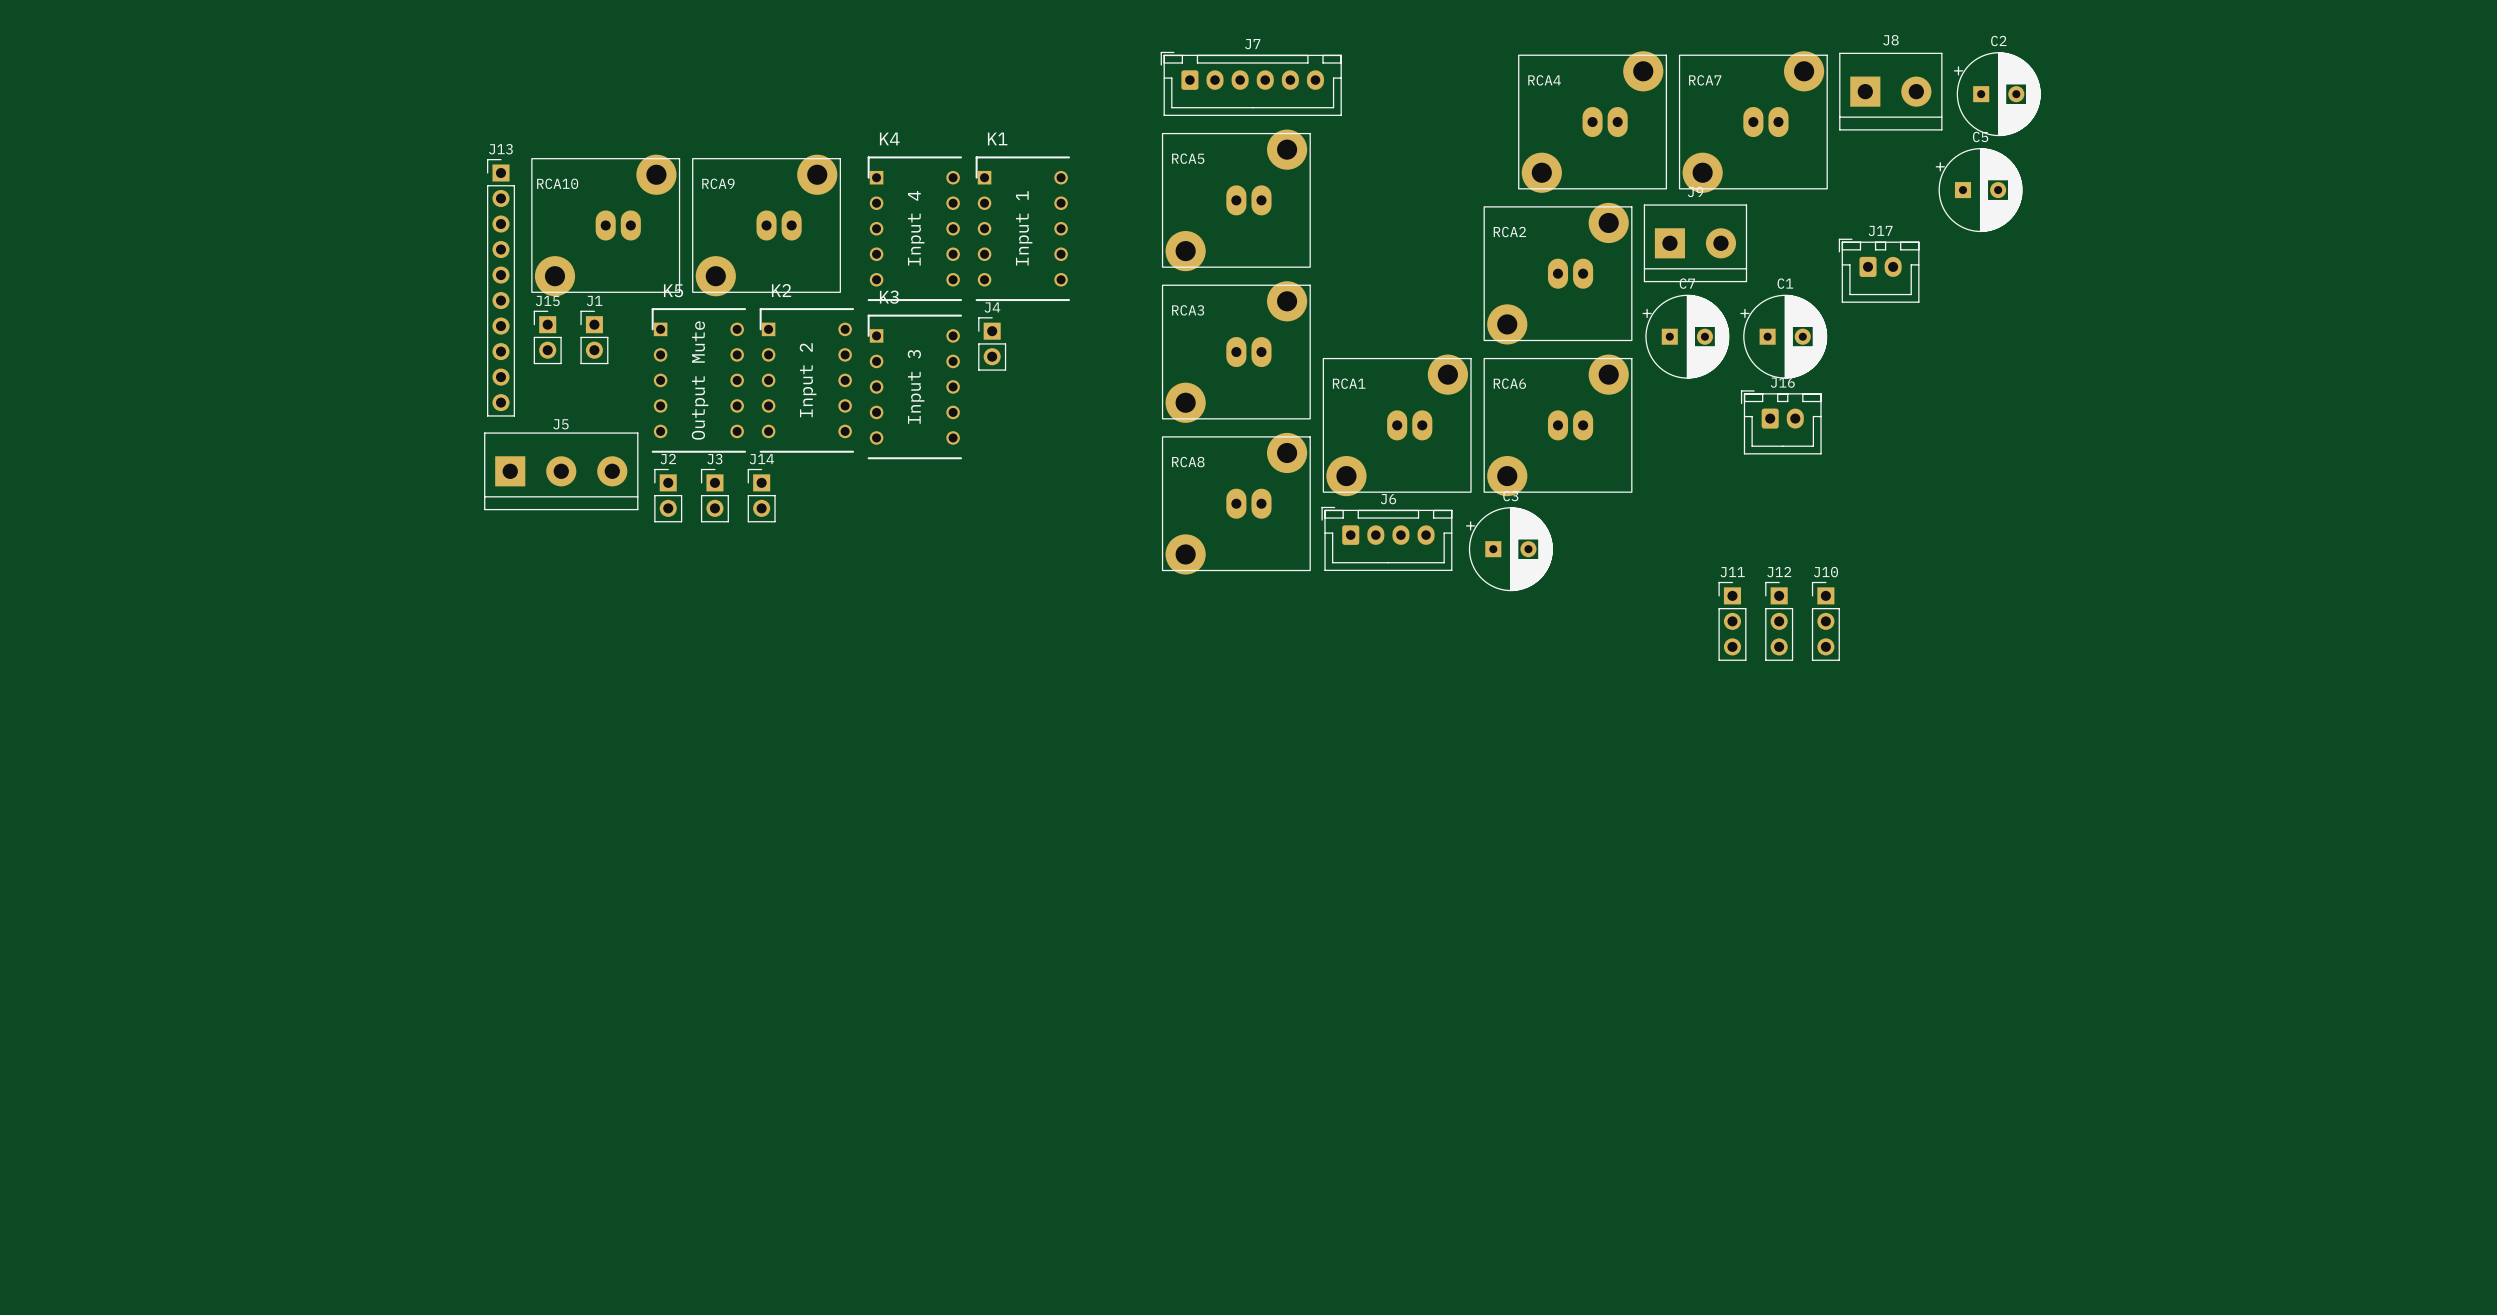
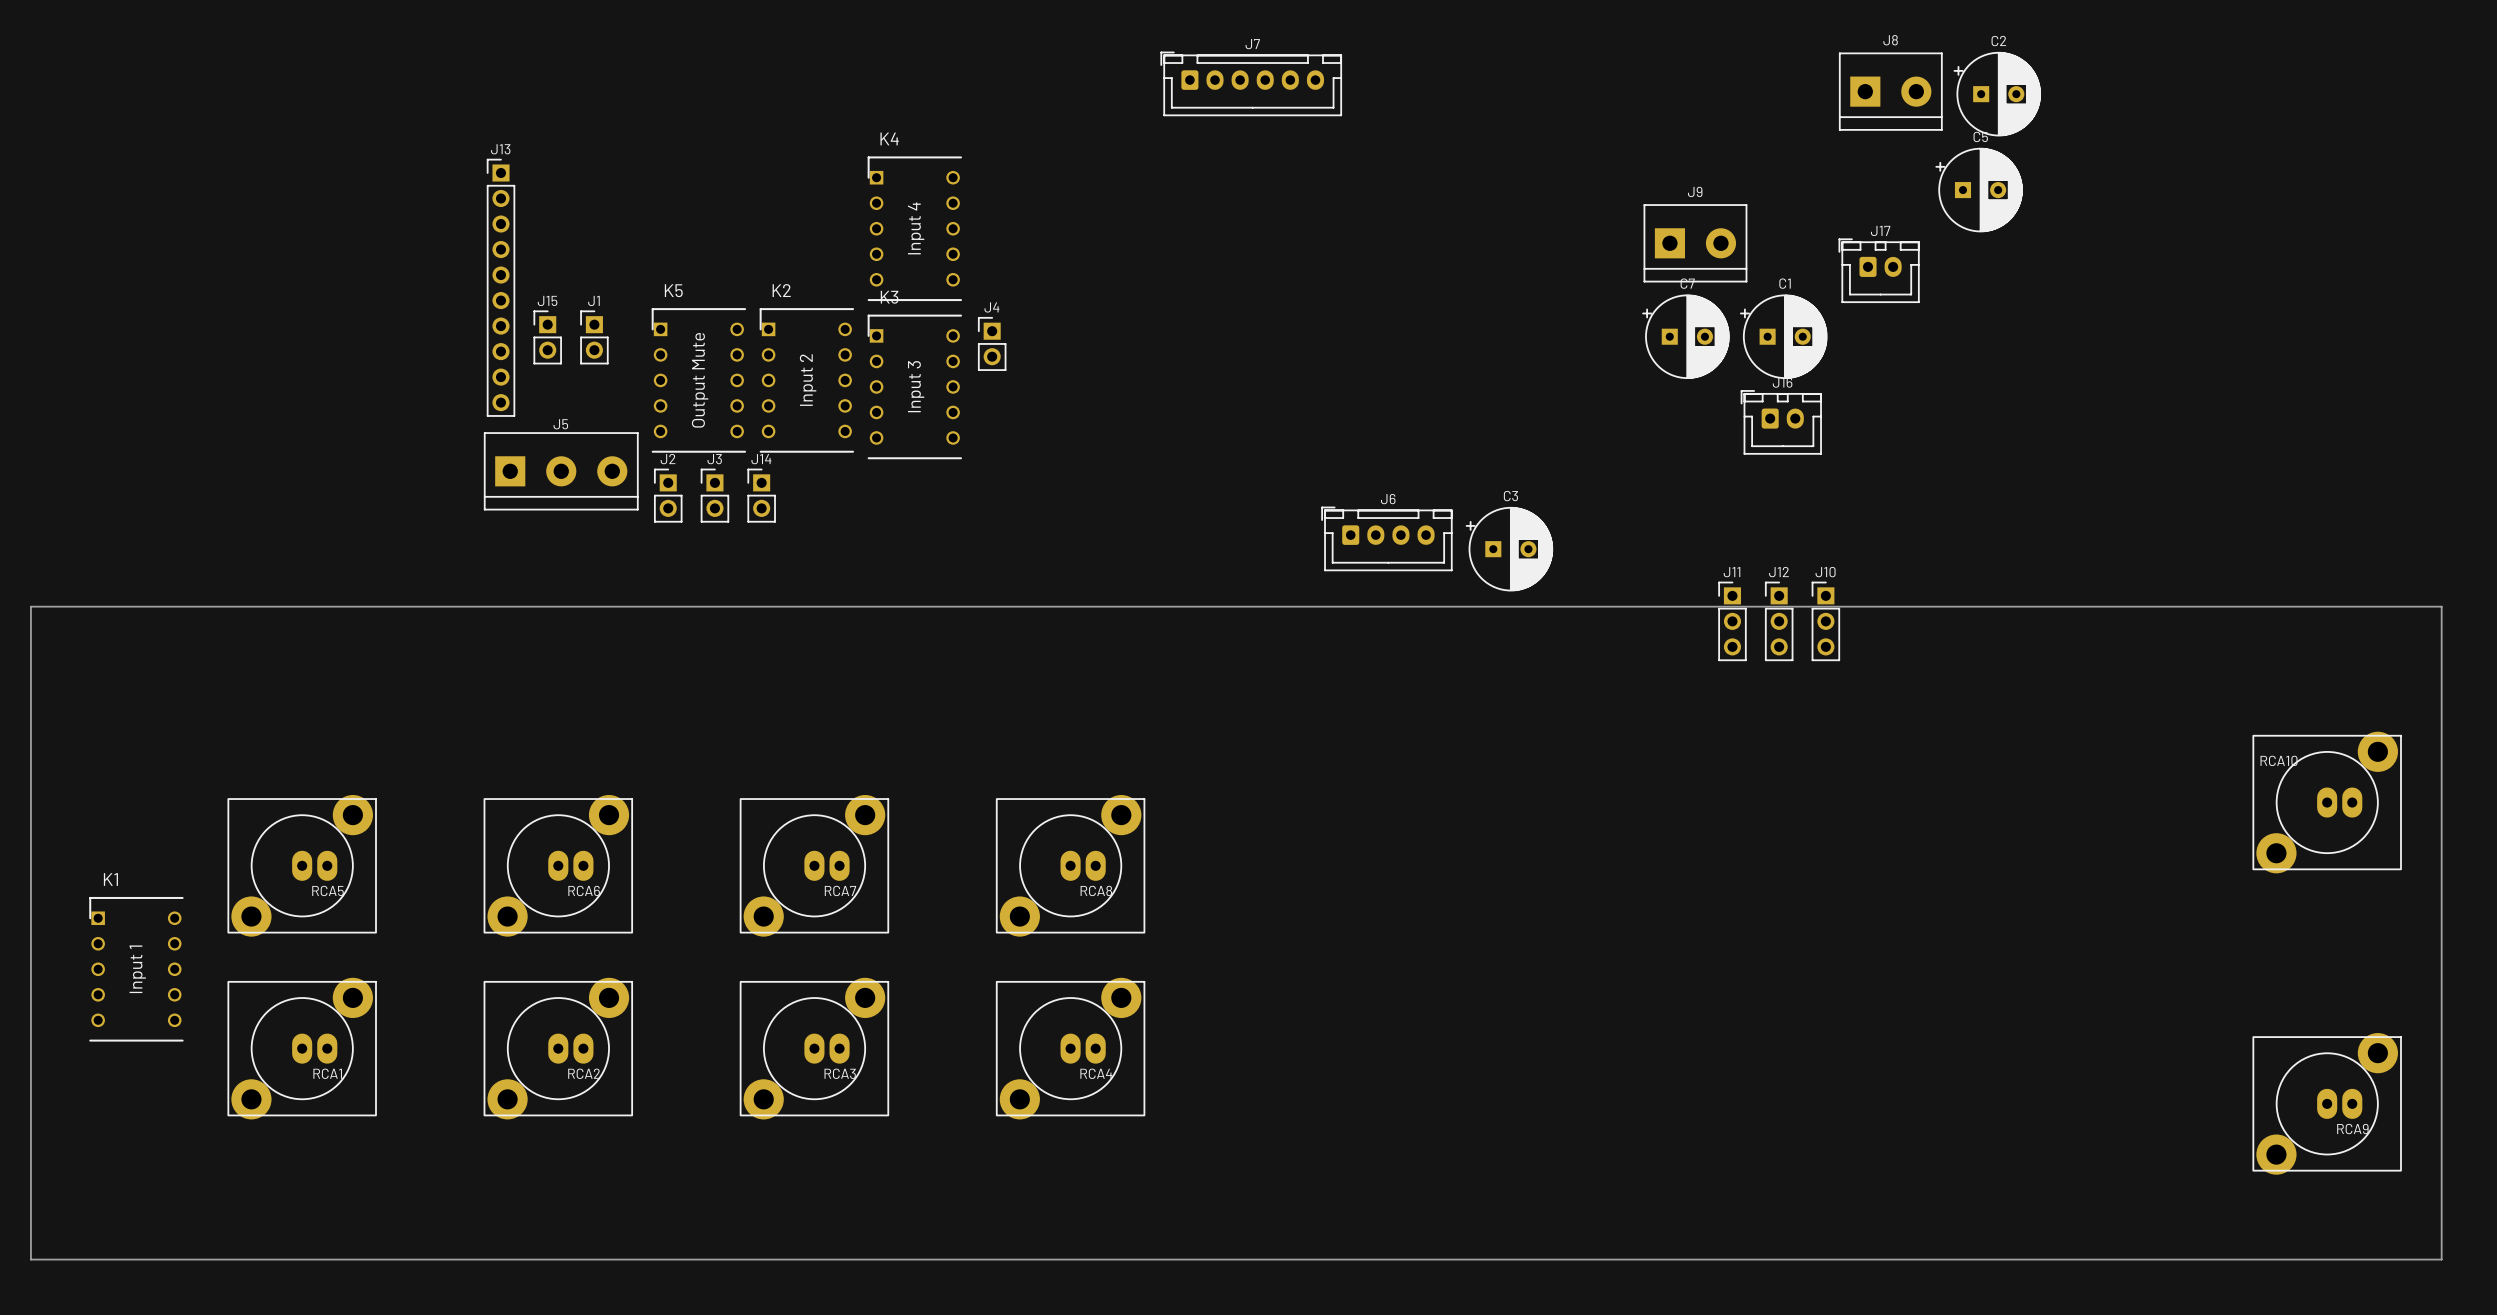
RCA4 footprint: [1518, 51, 1667, 193] -> [996, 977, 1146, 1120]
RCA7 footprint: [1678, 51, 1828, 193] -> [740, 795, 889, 937]
RCA4 name position: RCA4 (1544, 80) -> RCA4 (1096, 1073)
RCA7 name position: RCA7 (1705, 80) -> RCA7 (840, 890)
RCA5 footprint: [1161, 129, 1311, 272] -> [227, 795, 377, 937]
RCA10 footprint: [531, 154, 681, 297] -> [2252, 731, 2402, 874]
RCA9 footprint: [692, 154, 841, 297] -> [2252, 1033, 2402, 1175]
RCA5 name position: RCA5 (1188, 158) -> RCA5 (327, 890)
RCA9 name position: RCA9 (718, 183) -> RCA9 (2352, 1129)
RCA2 footprint: [1483, 202, 1633, 345] -> [483, 977, 633, 1120]
K1 position: (1022, 228) -> (136, 969)
RCA2 name position: RCA2 (1509, 232) -> RCA2 (584, 1073)
RCA3 footprint: [1161, 281, 1311, 423] -> [740, 977, 889, 1120]
RCA3 name position: RCA3 (1188, 310) -> RCA3 (840, 1073)
RCA1 footprint: [1322, 354, 1472, 497] -> [227, 977, 377, 1120]
RCA6 footprint: [1483, 354, 1633, 497] -> [483, 795, 633, 937]
RCA1 name position: RCA1 (1349, 383) -> RCA1 (327, 1073)
RCA6 name position: RCA6 (1509, 383) -> RCA6 (584, 890)
RCA8 footprint: [1161, 432, 1311, 575] -> [996, 795, 1146, 937]
RCA8 name position: RCA8 (1188, 462) -> RCA8 (1096, 890)
board edge: none -> (30, 606) (30, 1259) (2441, 1259) (2441, 606) (30, 606)

